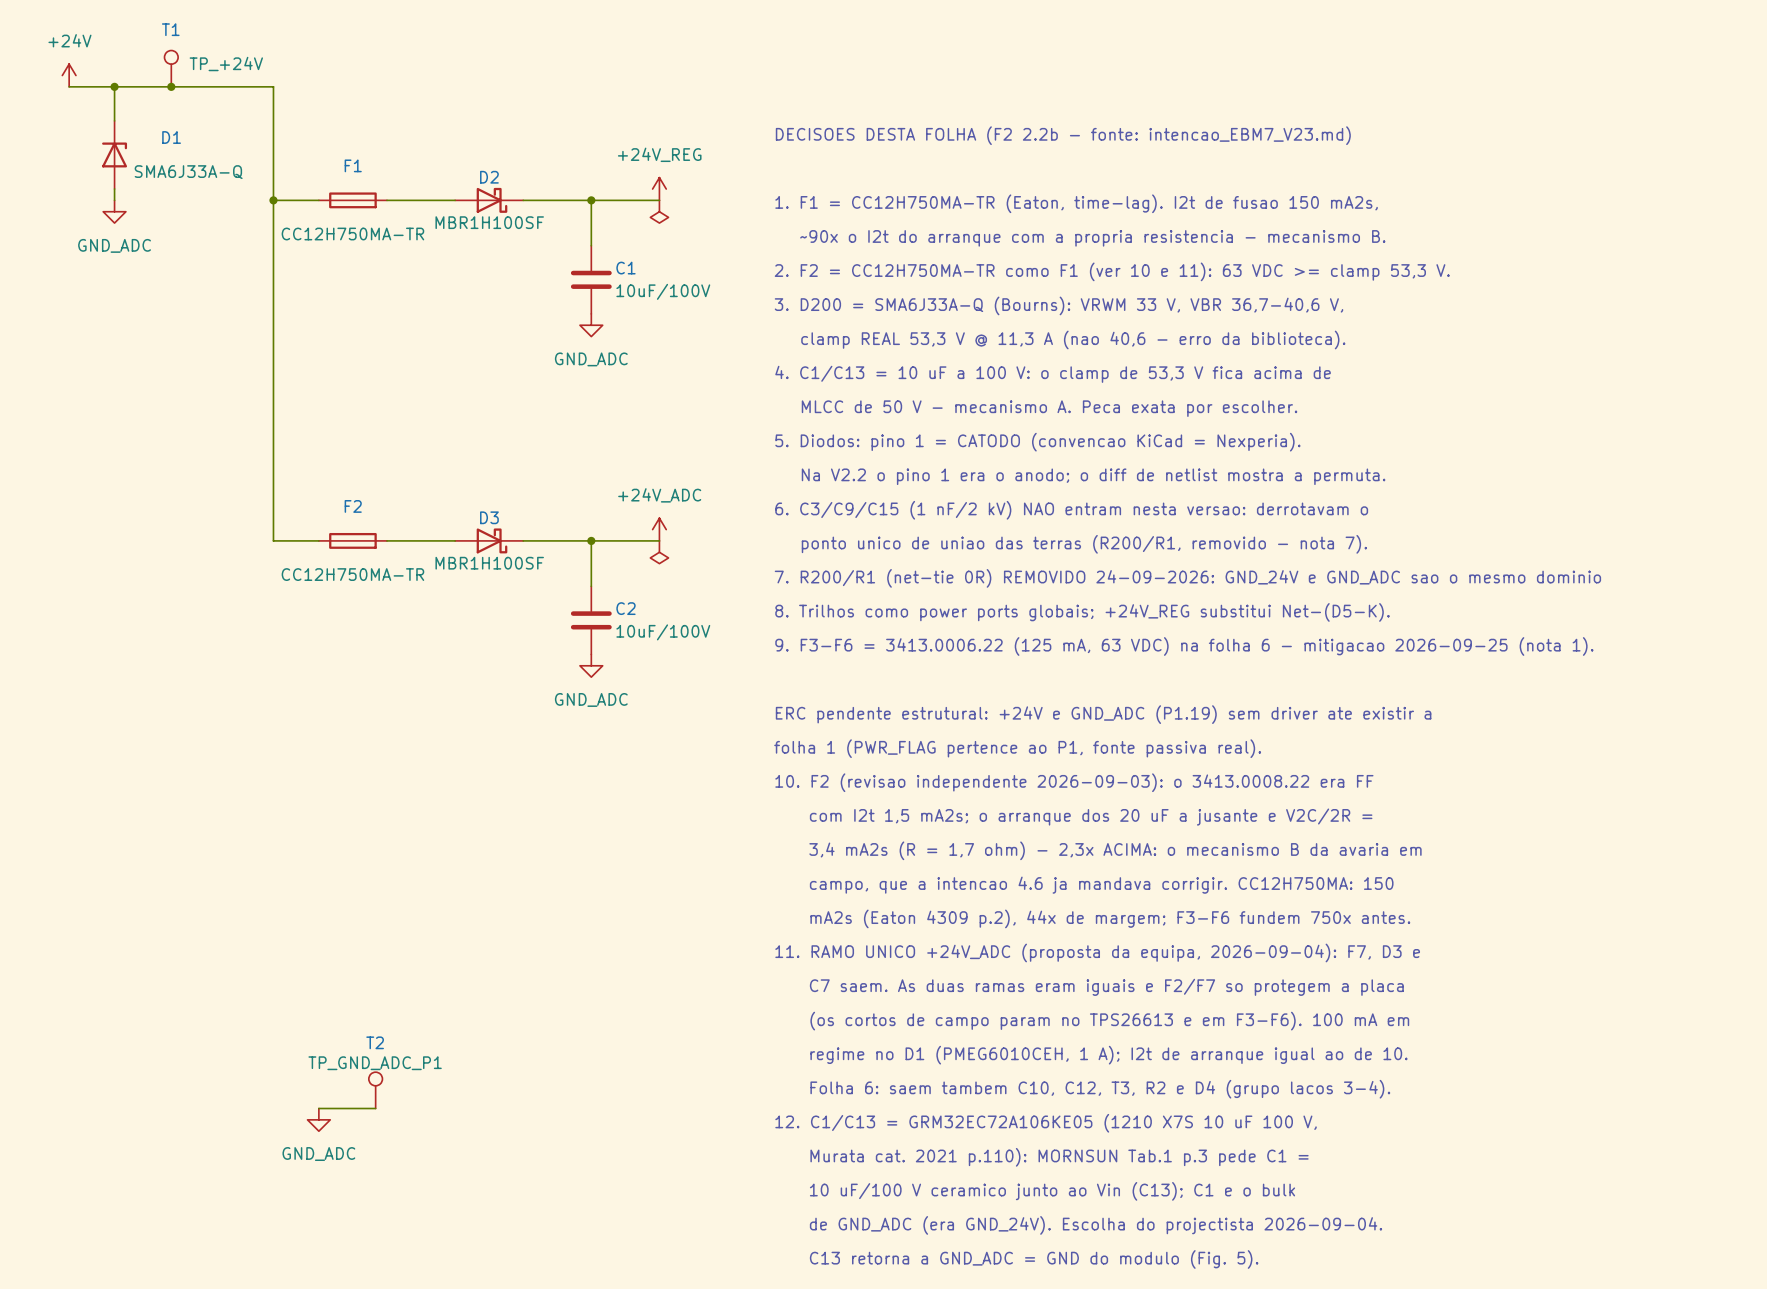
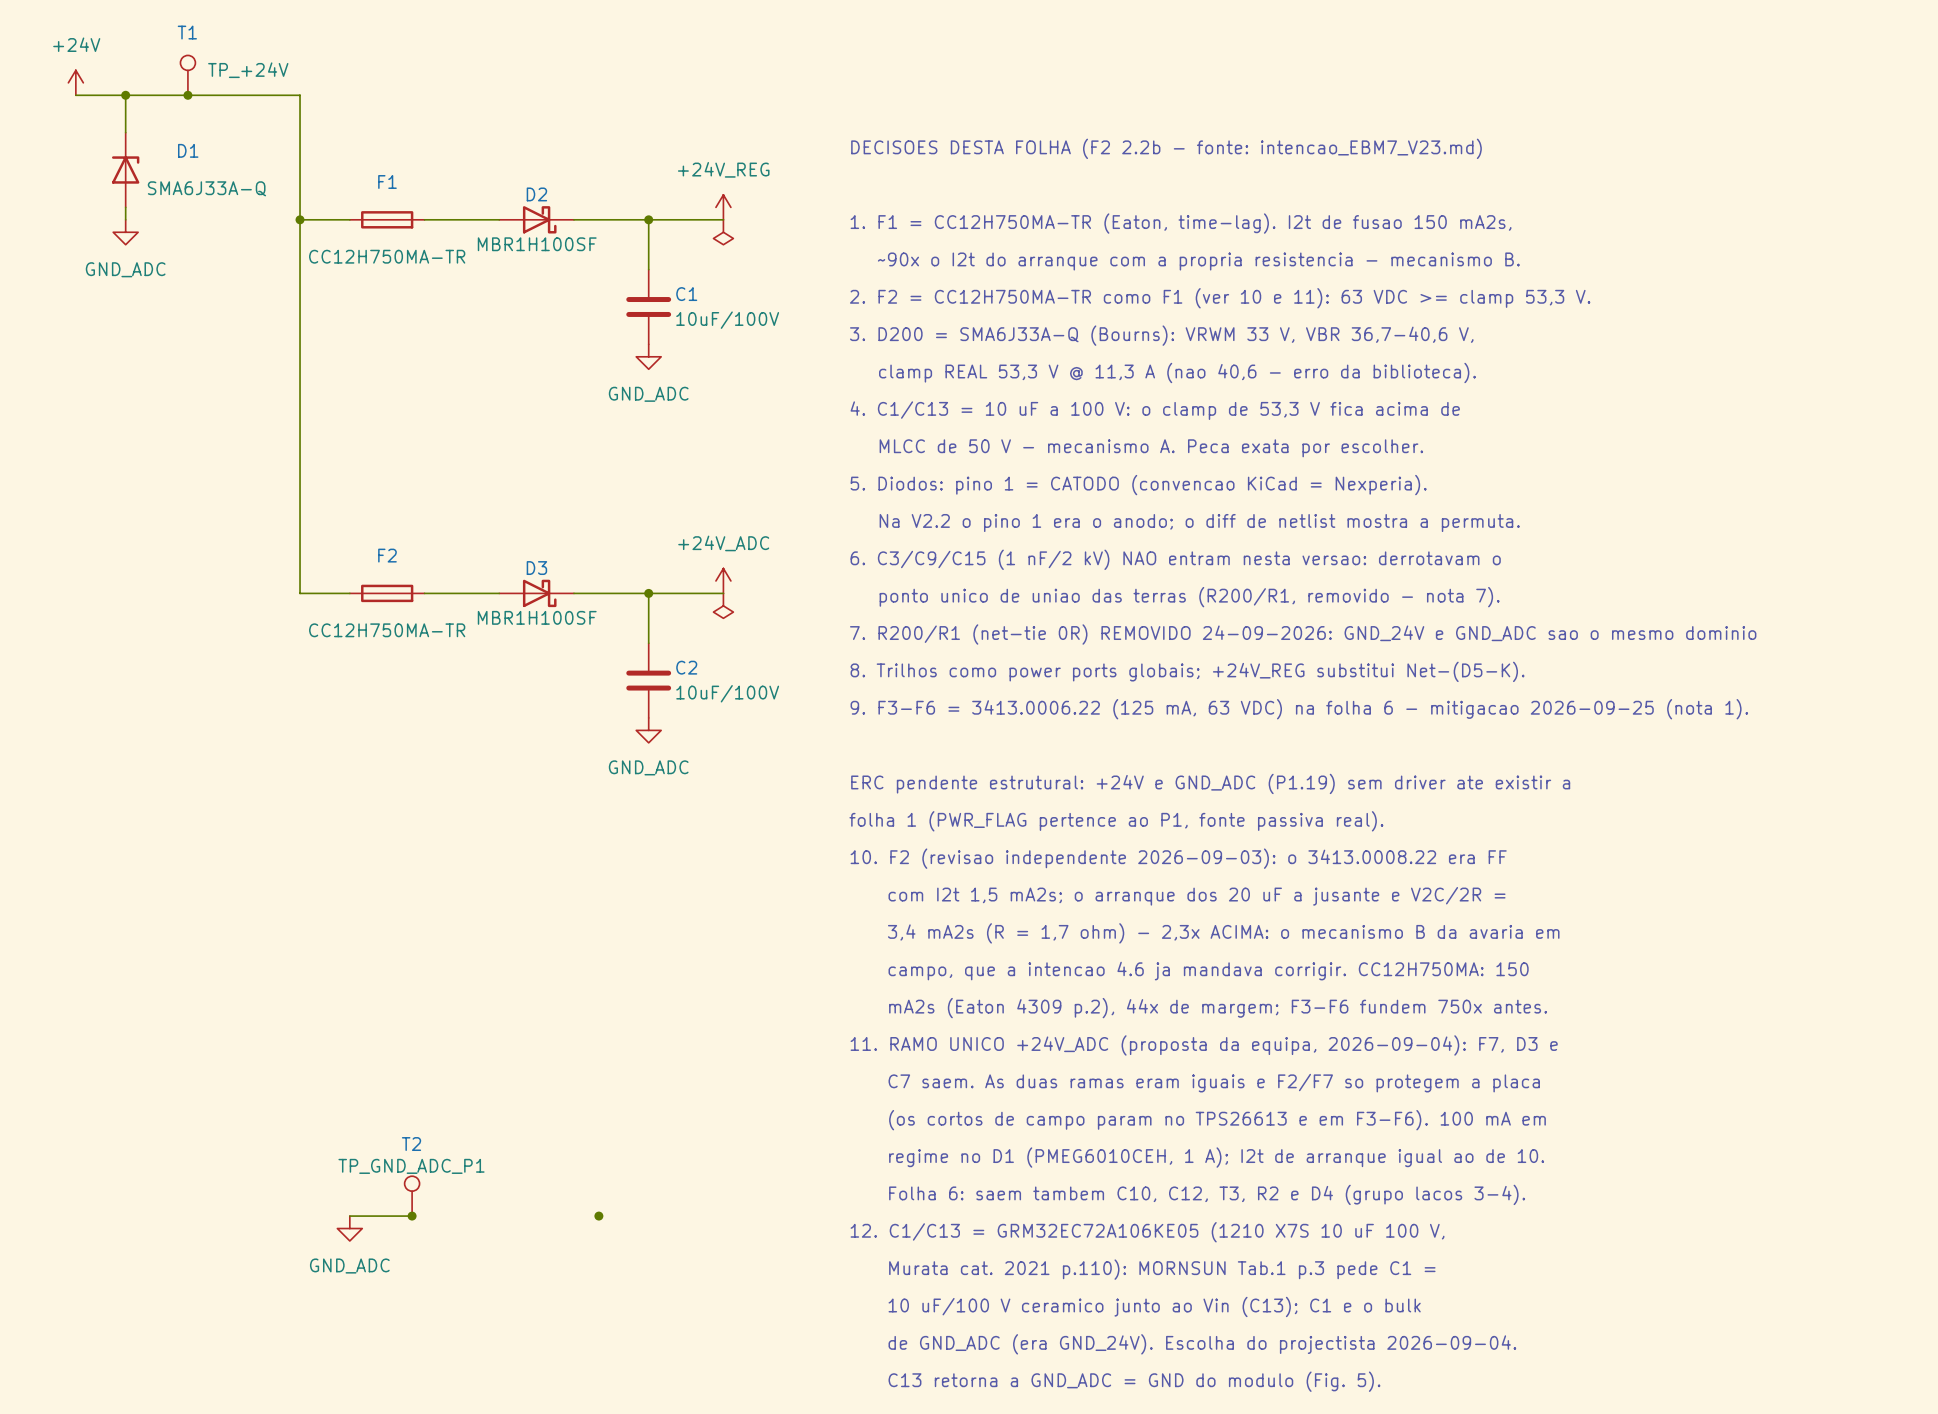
junction: none -> (412, 1216)
junction: none -> (598, 1216)

